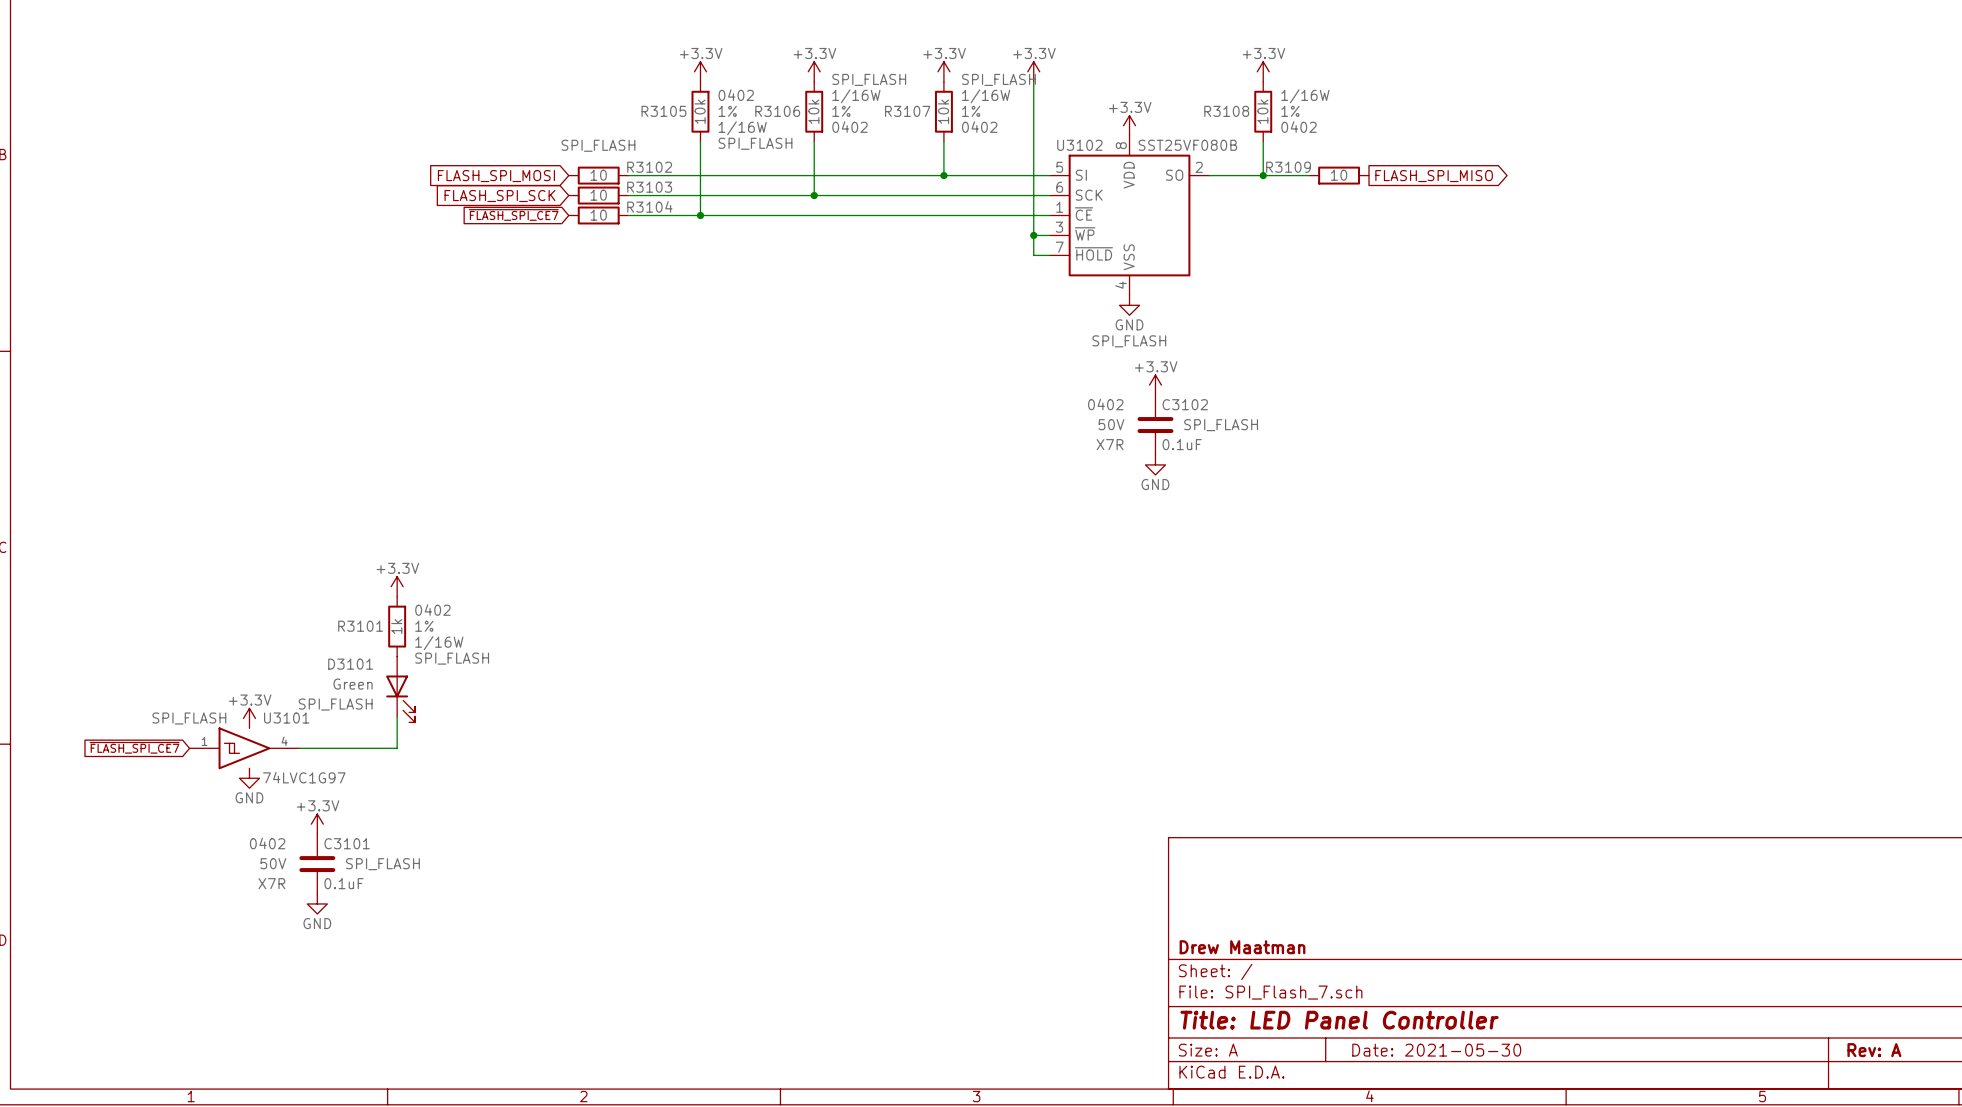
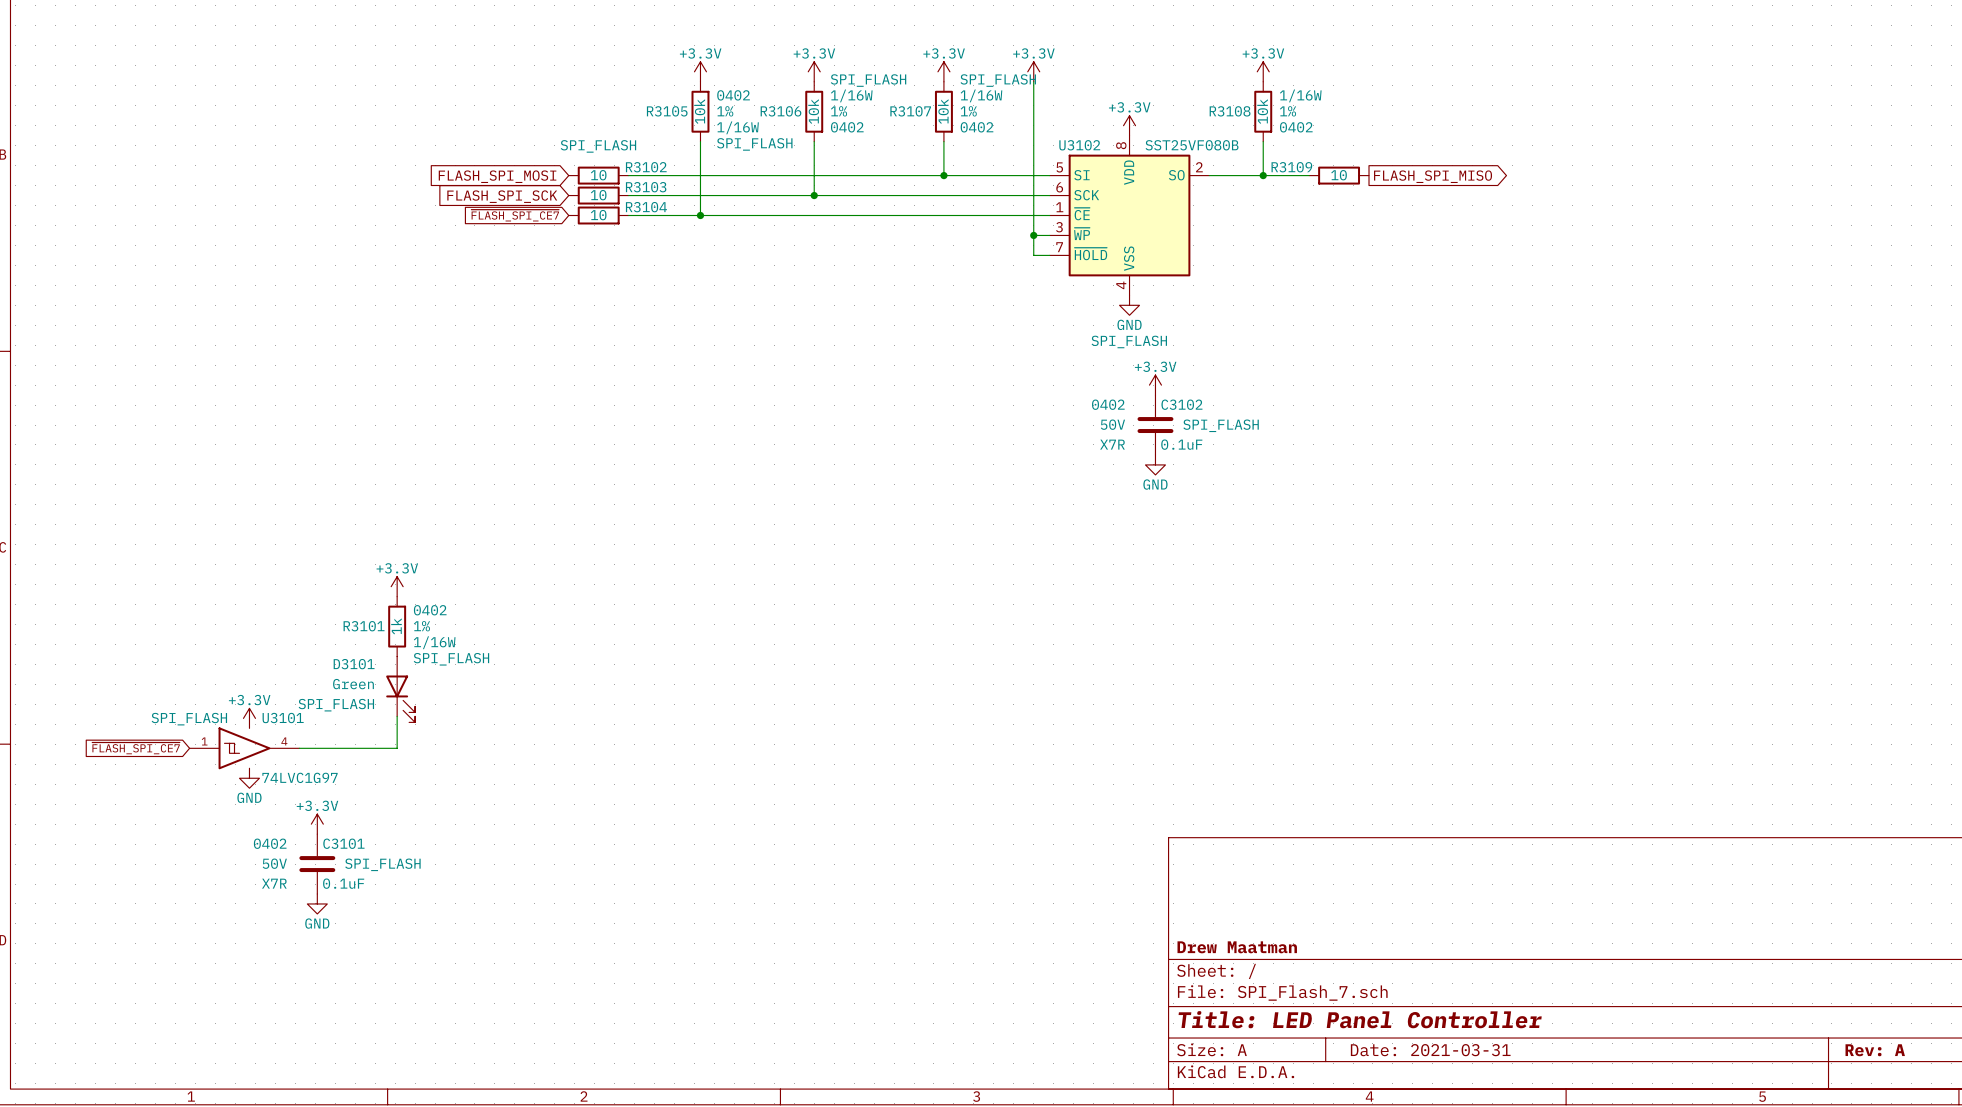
title block: Date: 2021-05-30 (1436, 1050) -> Date: 2021-03-31 (1430, 1050)

